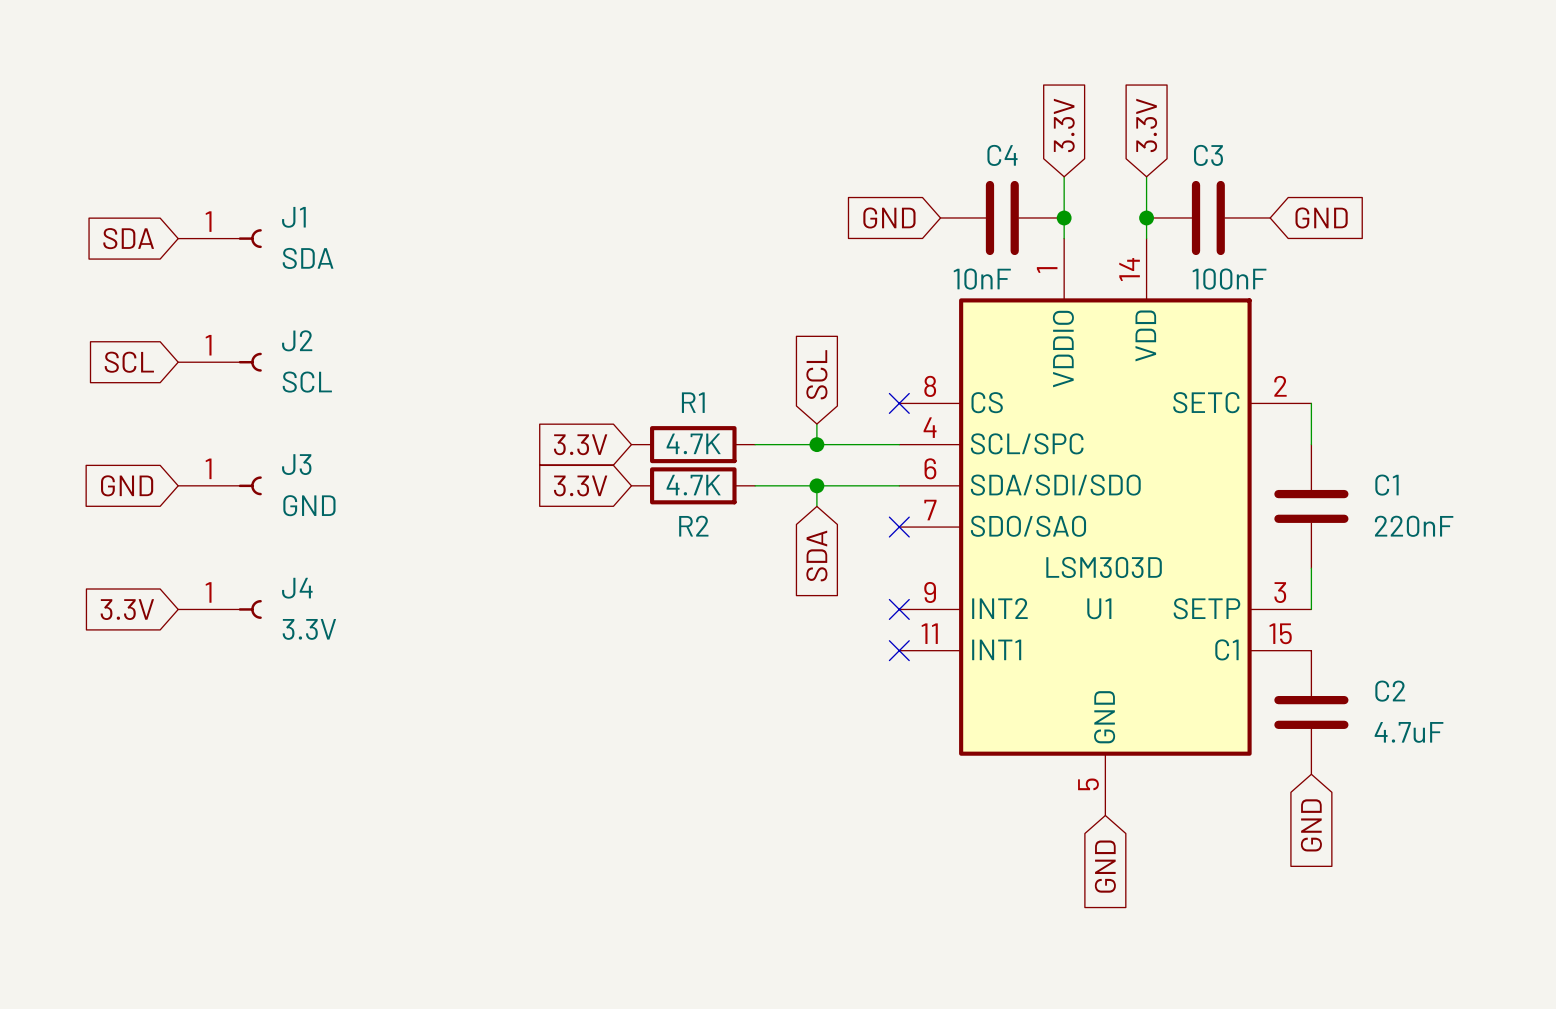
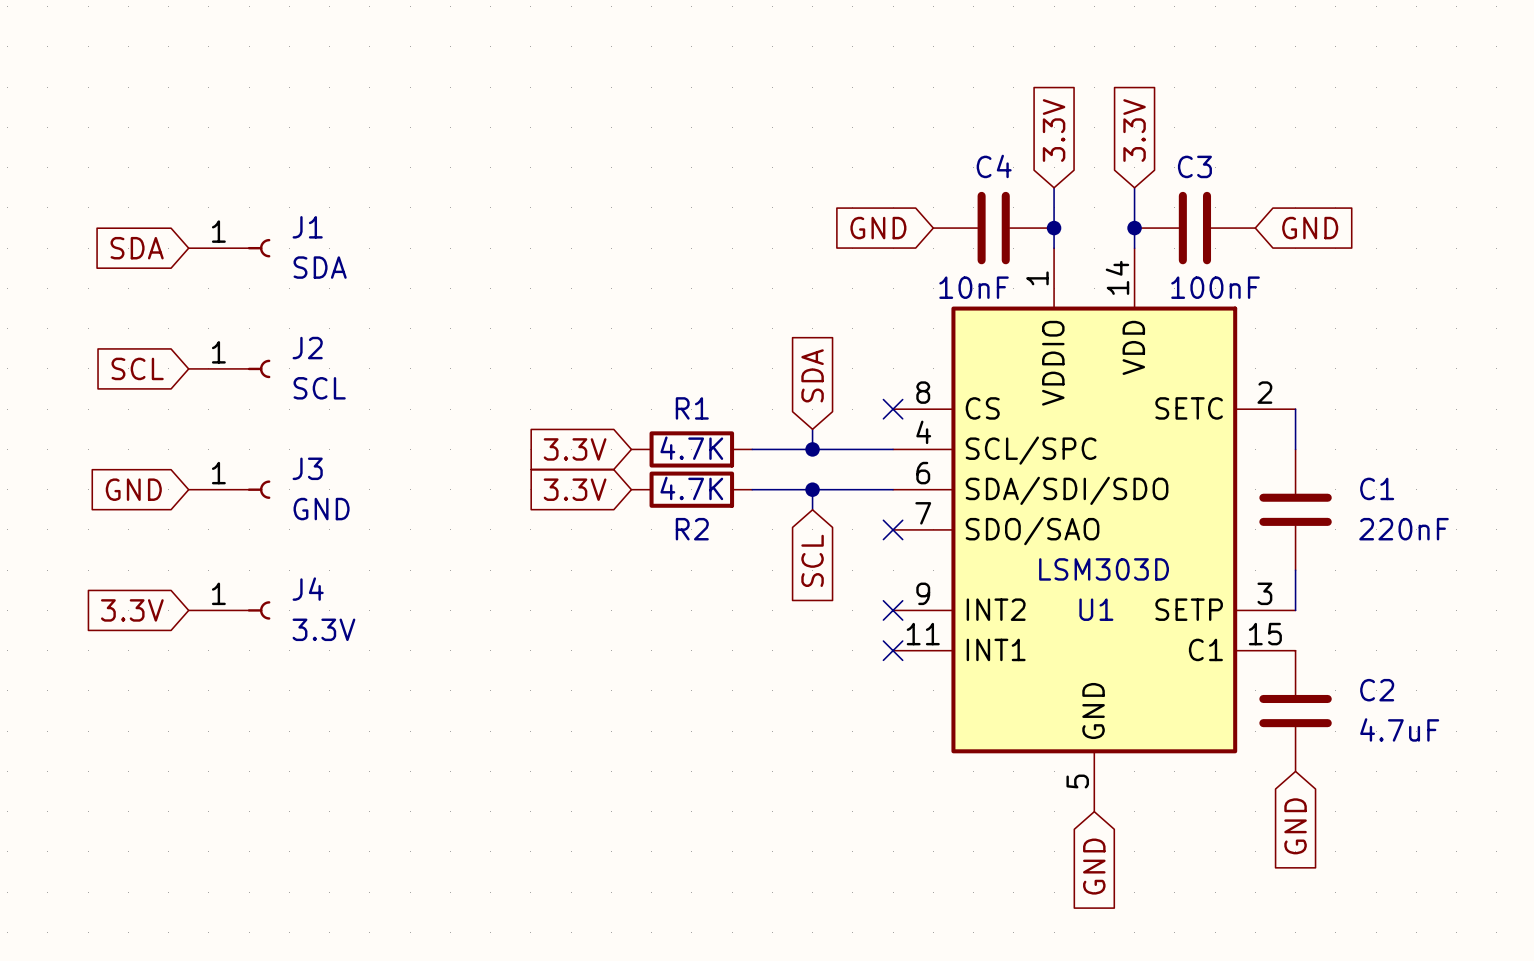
global label: SCL (816, 374) -> SDA (812, 375)
global label: SDA (816, 555) -> SCL (812, 560)

